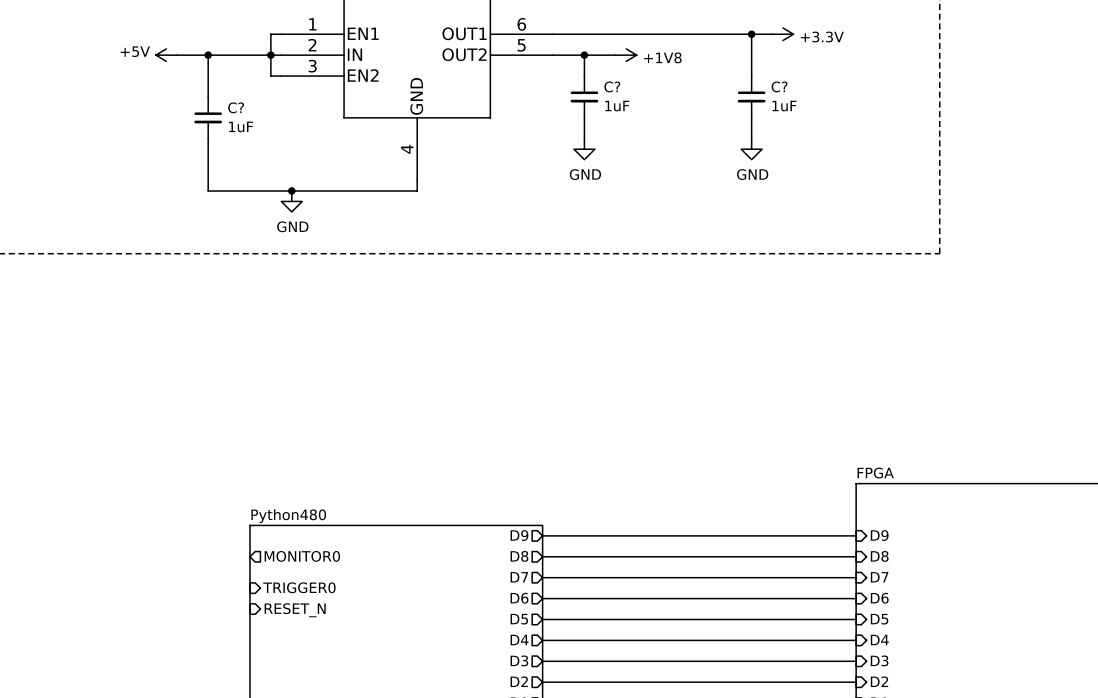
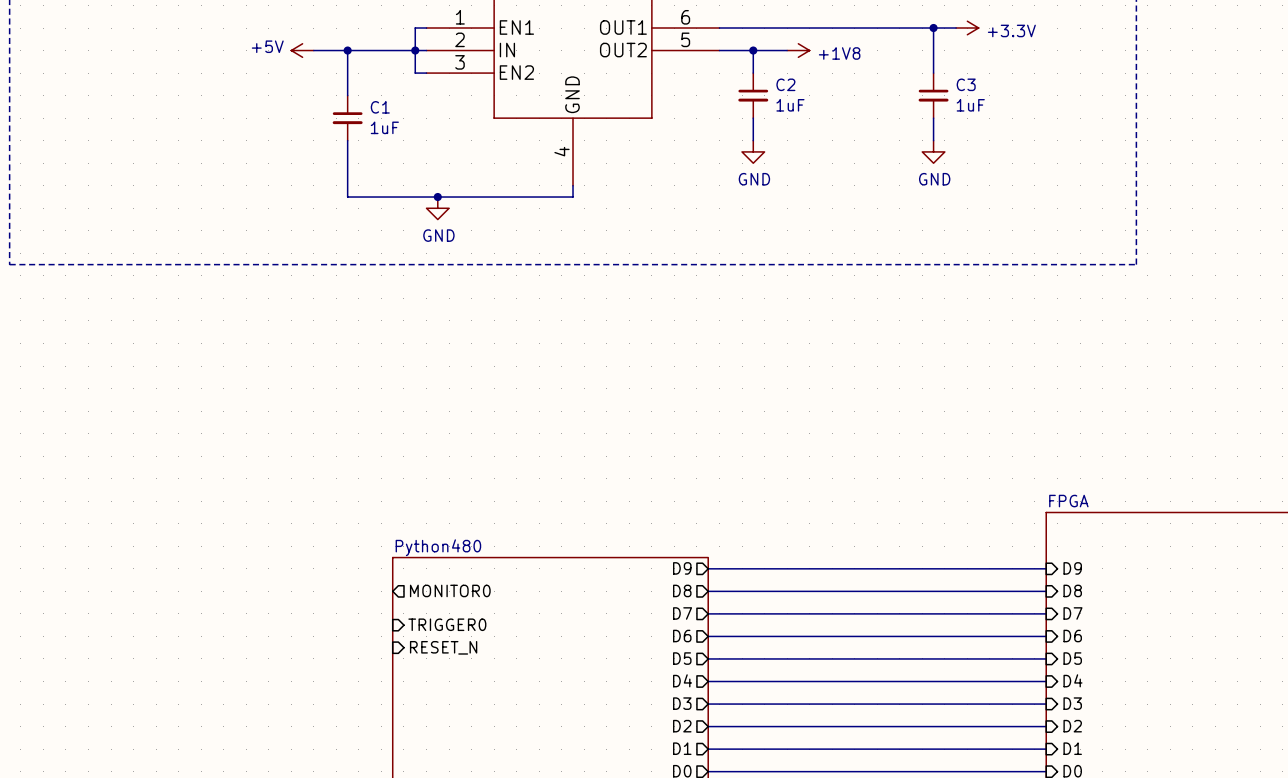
C? name: C? (612, 86) -> C2 (785, 84)
C? name: C? (779, 86) -> C3 (966, 84)
C? name: C? (236, 107) -> C1 (380, 107)

